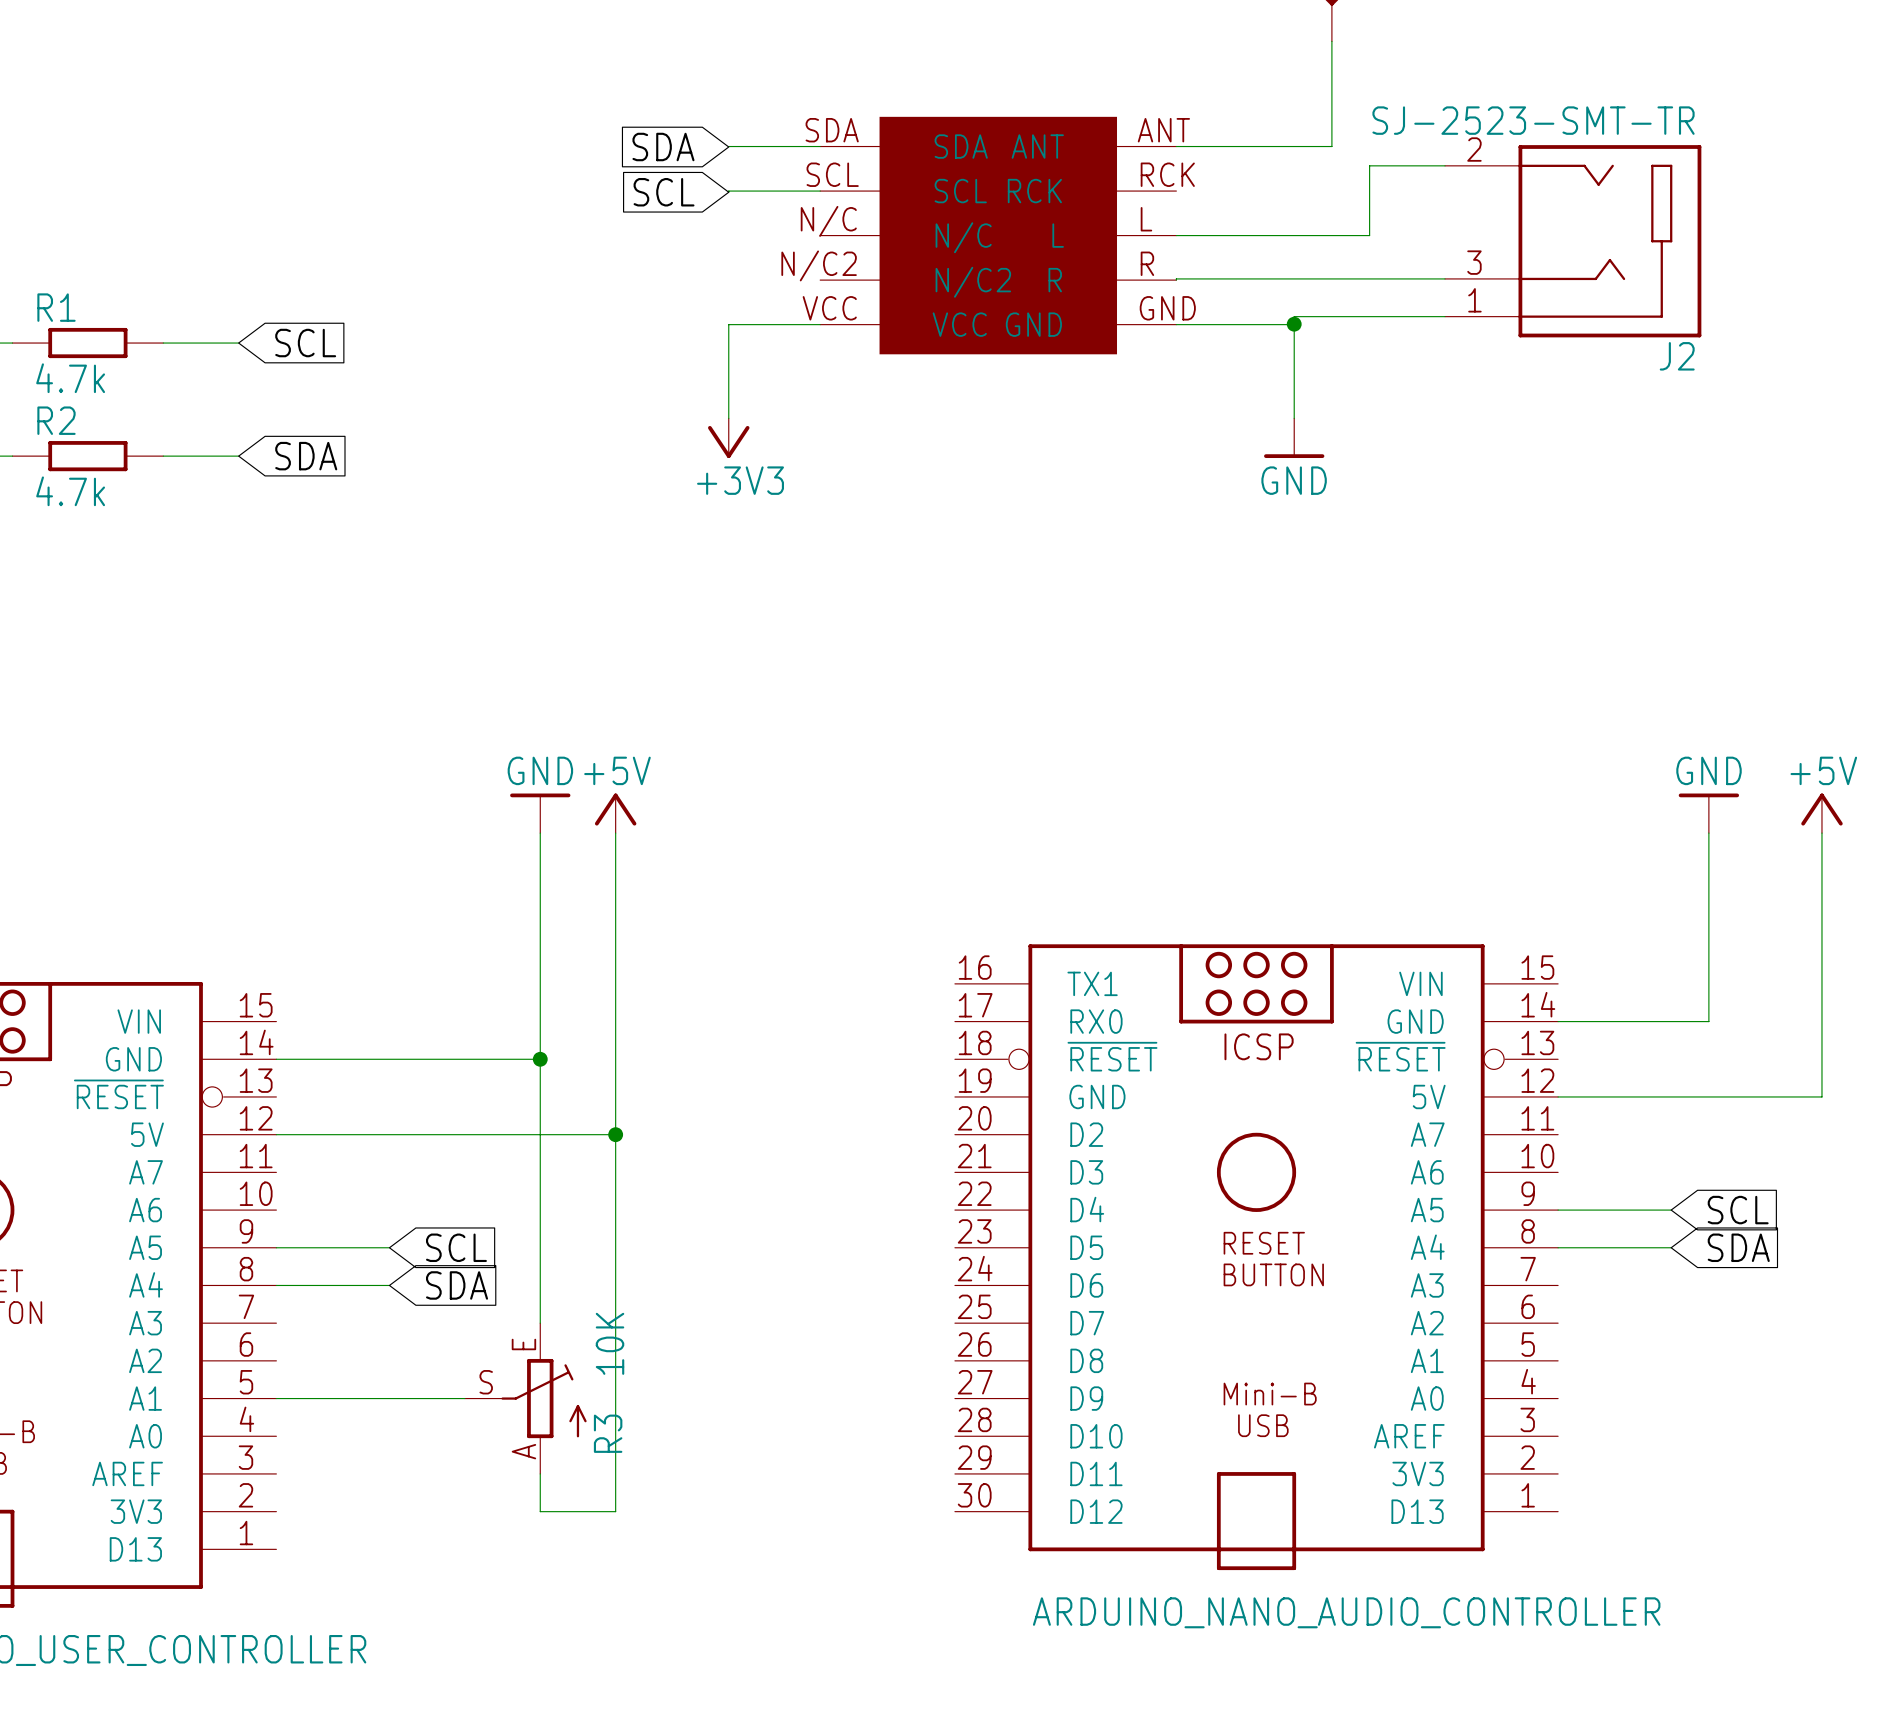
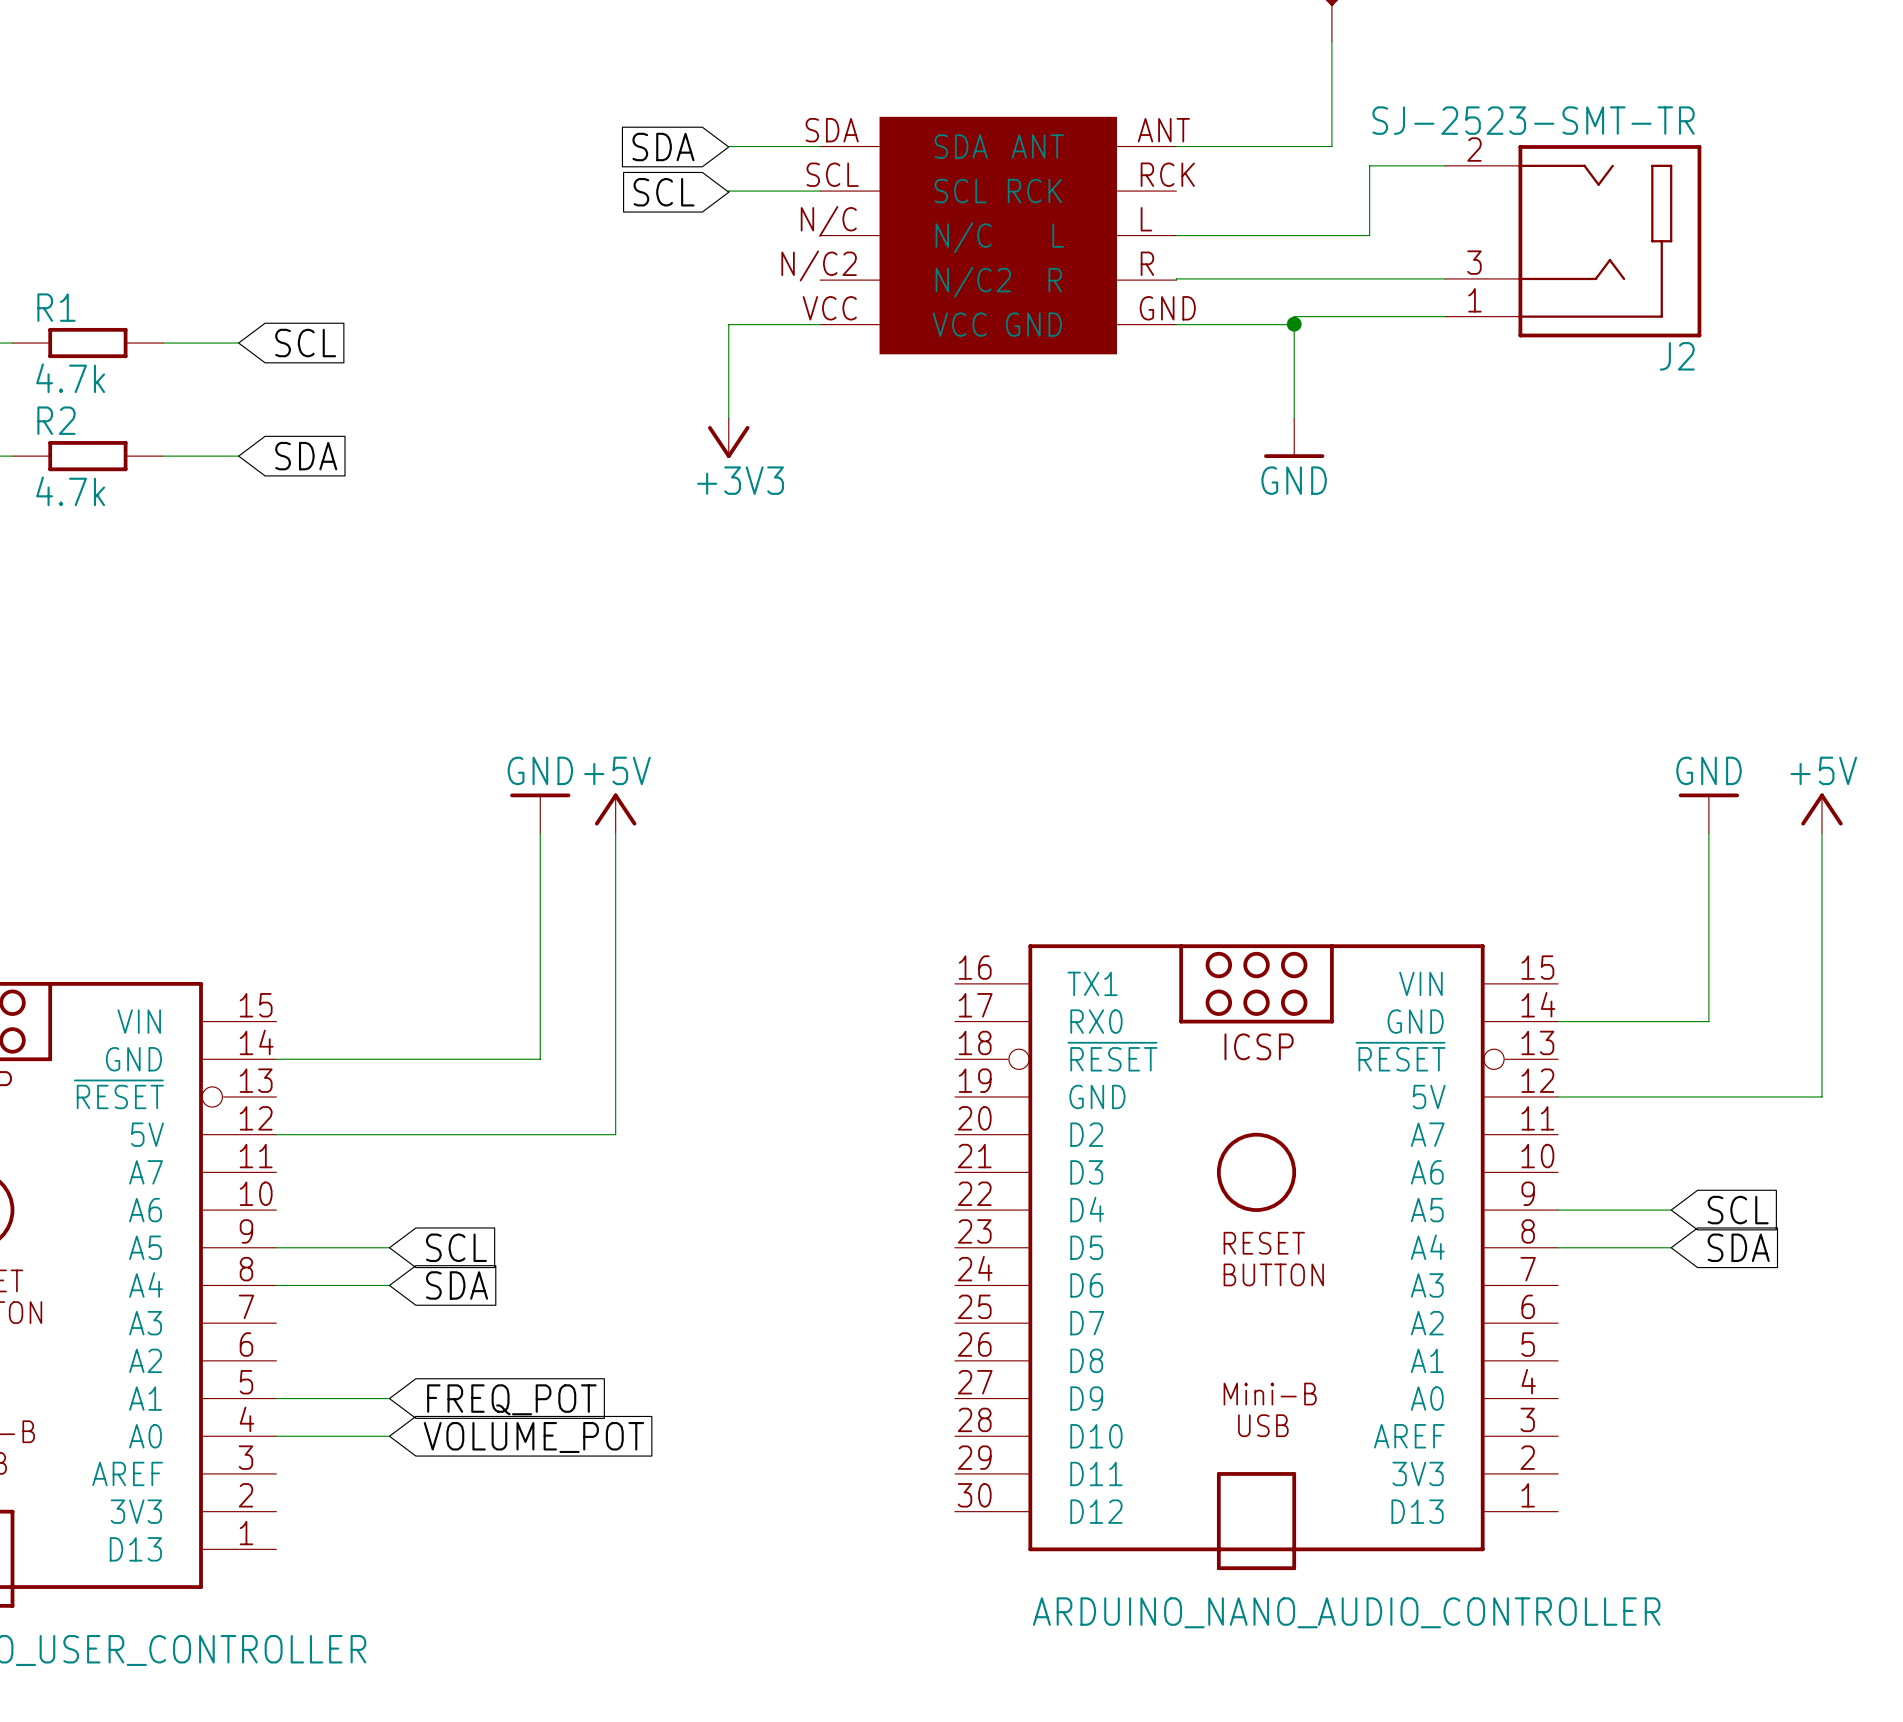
wire: (540, 1059) (540, 1323) -> none
junction: (540, 1059) -> none
wire: (615, 1134) (615, 1511) (540, 1511) (540, 1473) -> none
junction: (615, 1134) -> none
wire: (389, 1398) (464, 1398) -> none
R3: 10K (525, 1398) -> none
global label: none -> FREQ_POT (511, 1399)
wire: none -> (276, 1436) (389, 1436)
global label: none -> VOLUME_POT (533, 1437)

